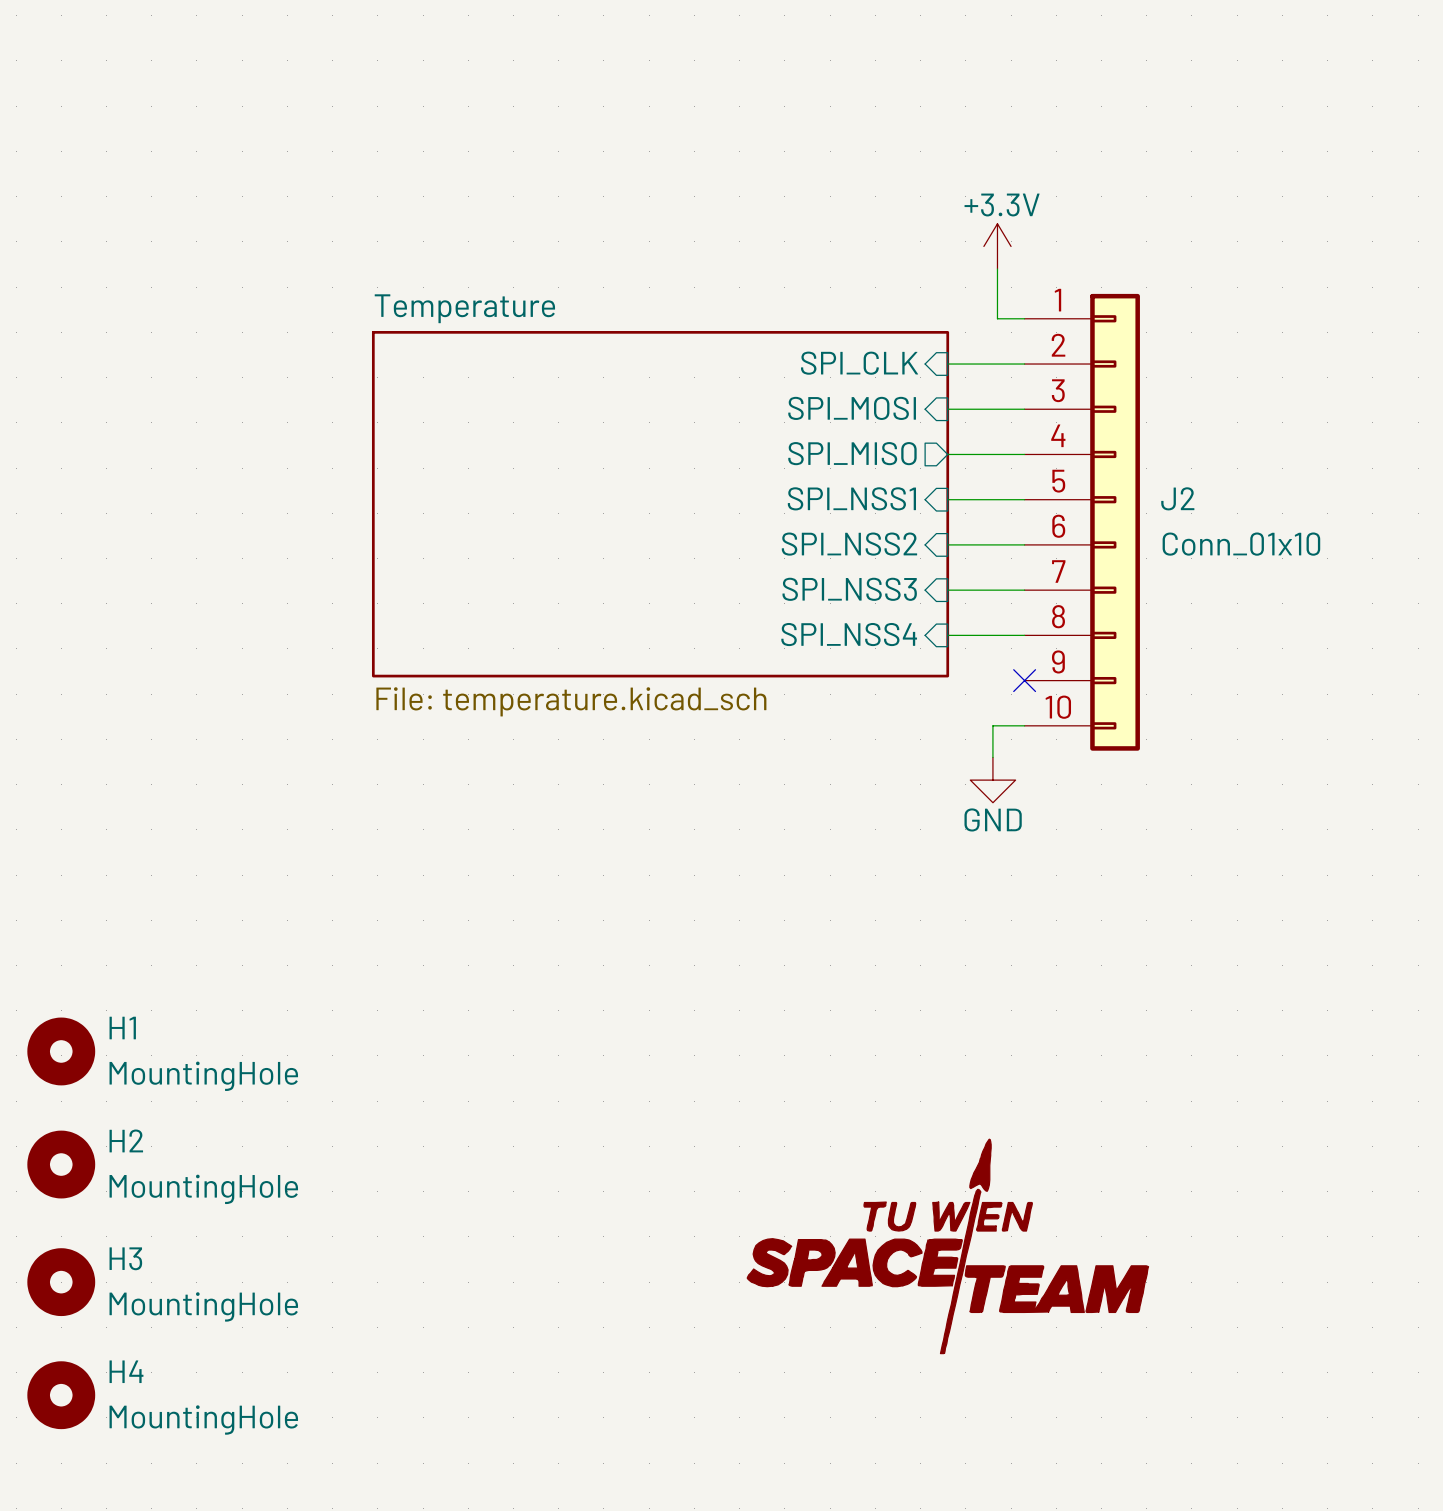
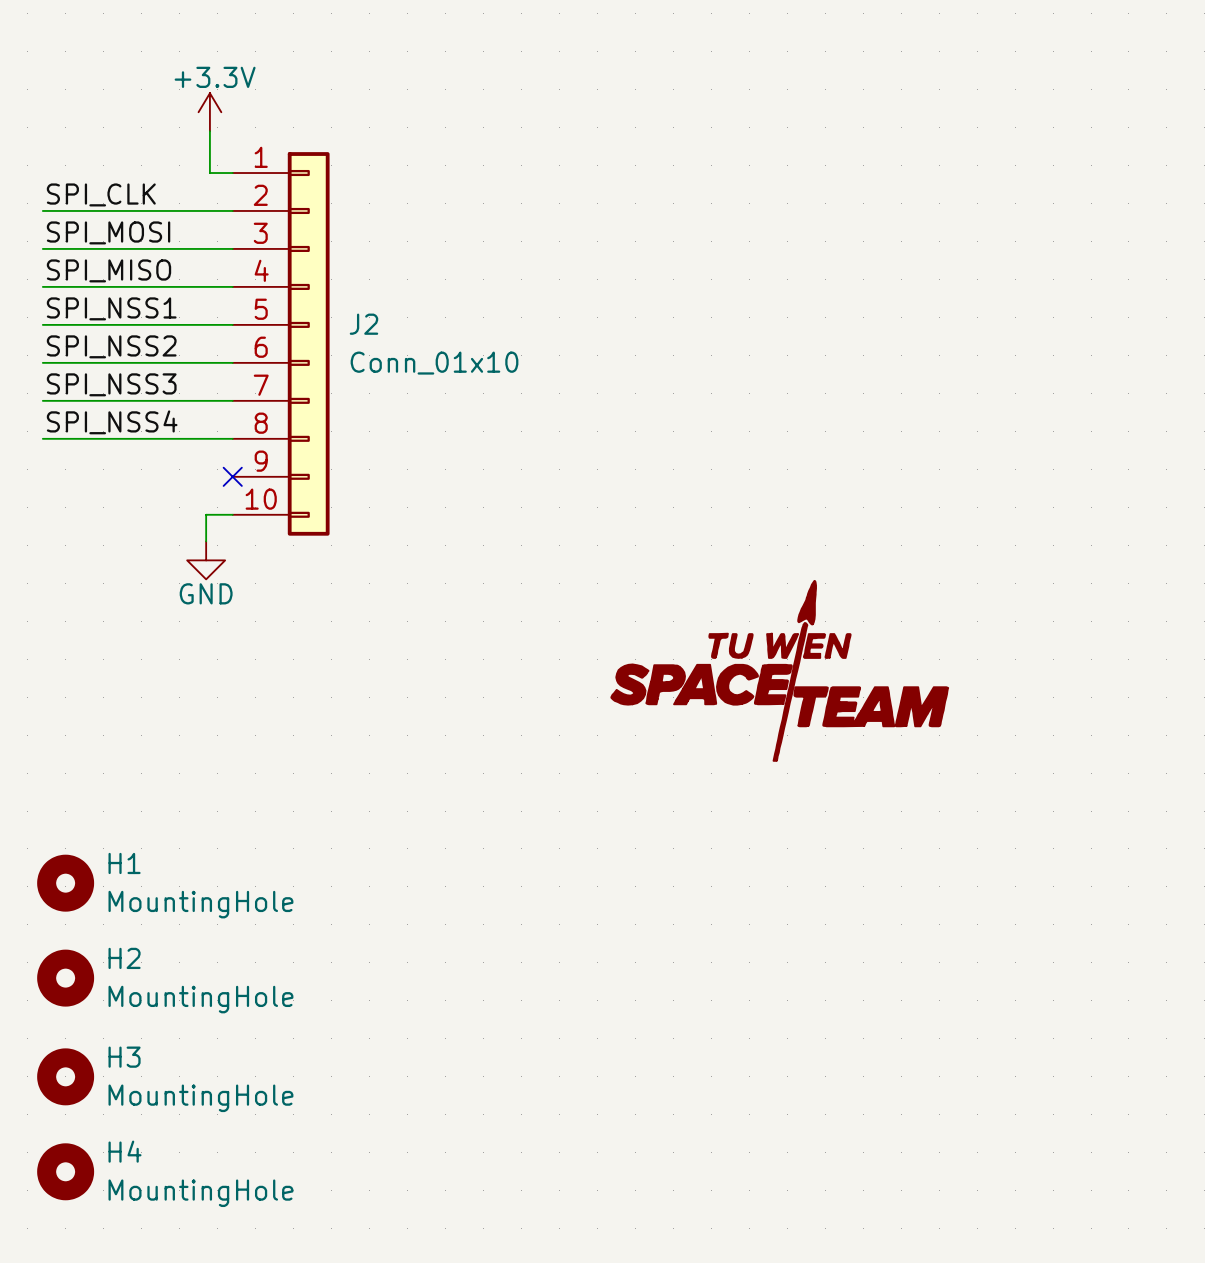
power symbol: none -> +3.3V (209, 112)
wire: none -> (209, 131) (209, 173) (232, 173)
label: none -> SPI_CLK (101, 194)
power symbol: +3.3V (997, 246) -> none
wire: none -> (42, 210) (232, 210)
wire: (997, 269) (997, 318) (1024, 318) -> none
label: none -> SPI_MOSI (108, 232)
wire: none -> (42, 248) (232, 248)
label: none -> SPI_MISO (108, 270)
wire: none -> (42, 286) (232, 286)
sheet pin: SPI_CLK (859, 363) -> none
wire: (947, 364) (1024, 364) -> none
label: none -> SPI_NSS1 (111, 308)
wire: none -> (42, 324) (232, 324)
sheet pin: SPI_MOSI (852, 408) -> none
wire: (947, 409) (1024, 409) -> none
label: none -> SPI_NSS2 (111, 346)
wire: none -> (42, 362) (232, 362)
sheet pin: SPI_MISO (852, 453) -> none
wire: (947, 454) (1024, 454) -> none
label: none -> SPI_NSS3 (111, 384)
wire: none -> (42, 400) (232, 400)
sheet pin: SPI_NSS1 (851, 498) -> none
wire: (947, 499) (1024, 499) -> none
label: none -> SPI_NSS4 (112, 422)
sheet Temperature: File: temperature.kicad_sch (660, 504) -> none
wire: none -> (42, 438) (232, 438)
J2 position: (1082, 522) -> (281, 343)
sheet pin: SPI_NSS2 (849, 544) -> none
wire: (947, 544) (1024, 544) -> none
no-connect mark: none -> (232, 476)
sheet pin: SPI_NSS3 (849, 589) -> none
wire: (947, 590) (1024, 590) -> none
wire: none -> (232, 514) (206, 514) (206, 541)
sheet pin: SPI_NSS4 (849, 634) -> none
wire: (947, 635) (1024, 635) -> none
power symbol: none -> GND (206, 560)
no-connect mark: (1024, 680) -> none
wire: (1024, 725) (992, 725) (992, 757) -> none
power symbol: GND (992, 780) -> none
part: none -> (779, 670)
power symbol: (947, 1246) -> none

